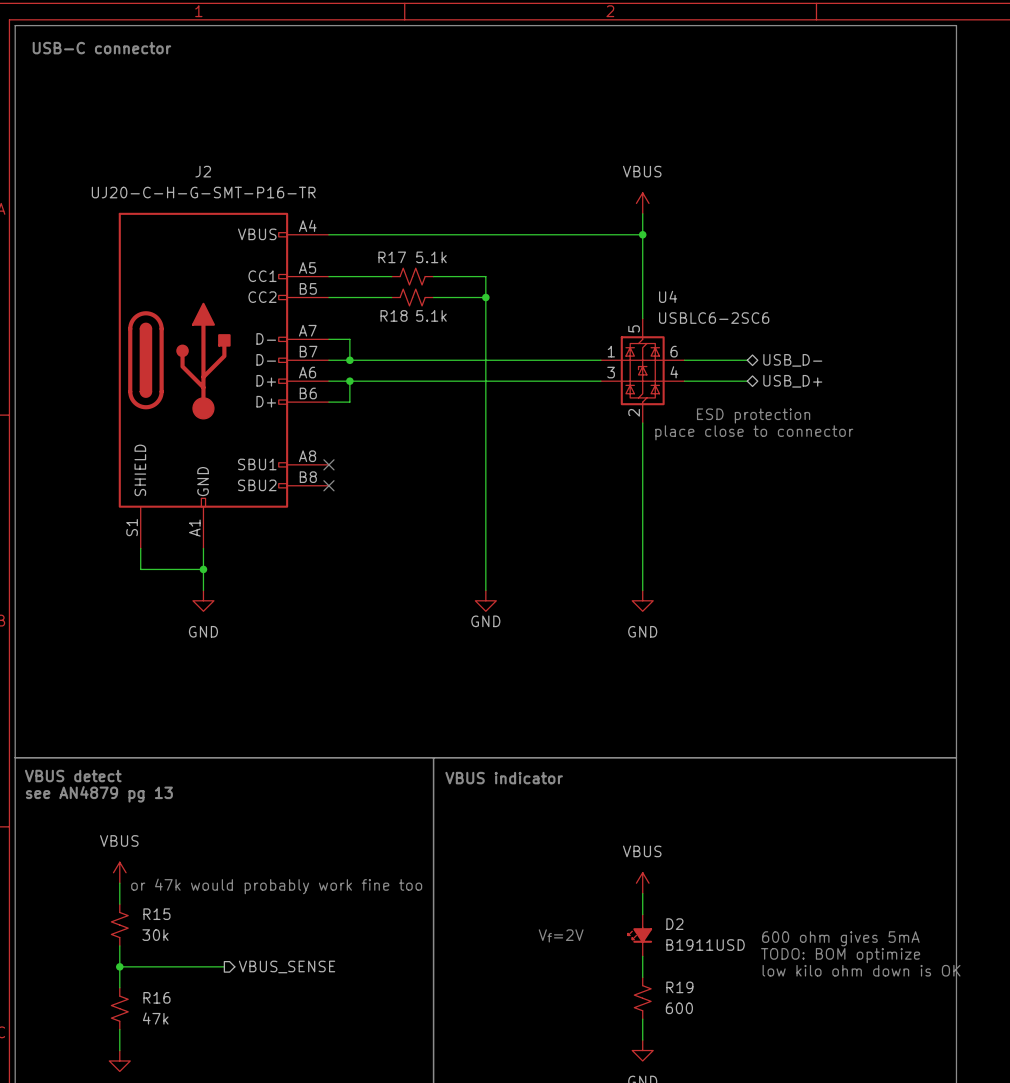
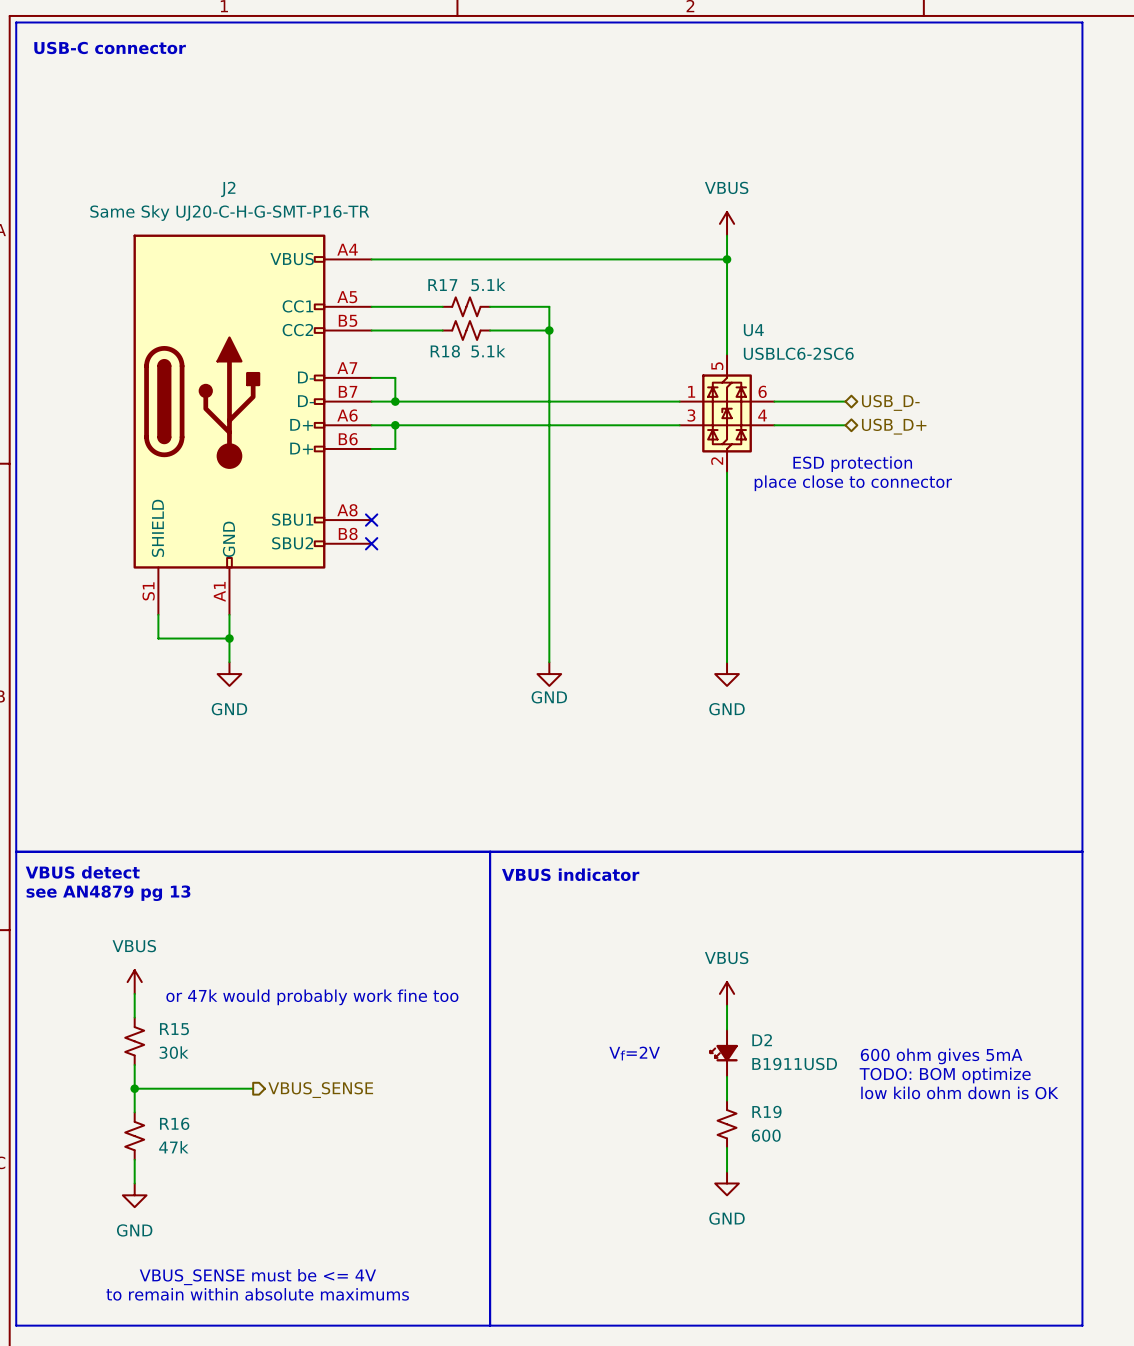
J2 value: UJ20-C-H-G-SMT-P16-TR (203, 192) -> Same Sky UJ20-C-H-G-SMT-P16-TR (229, 213)

